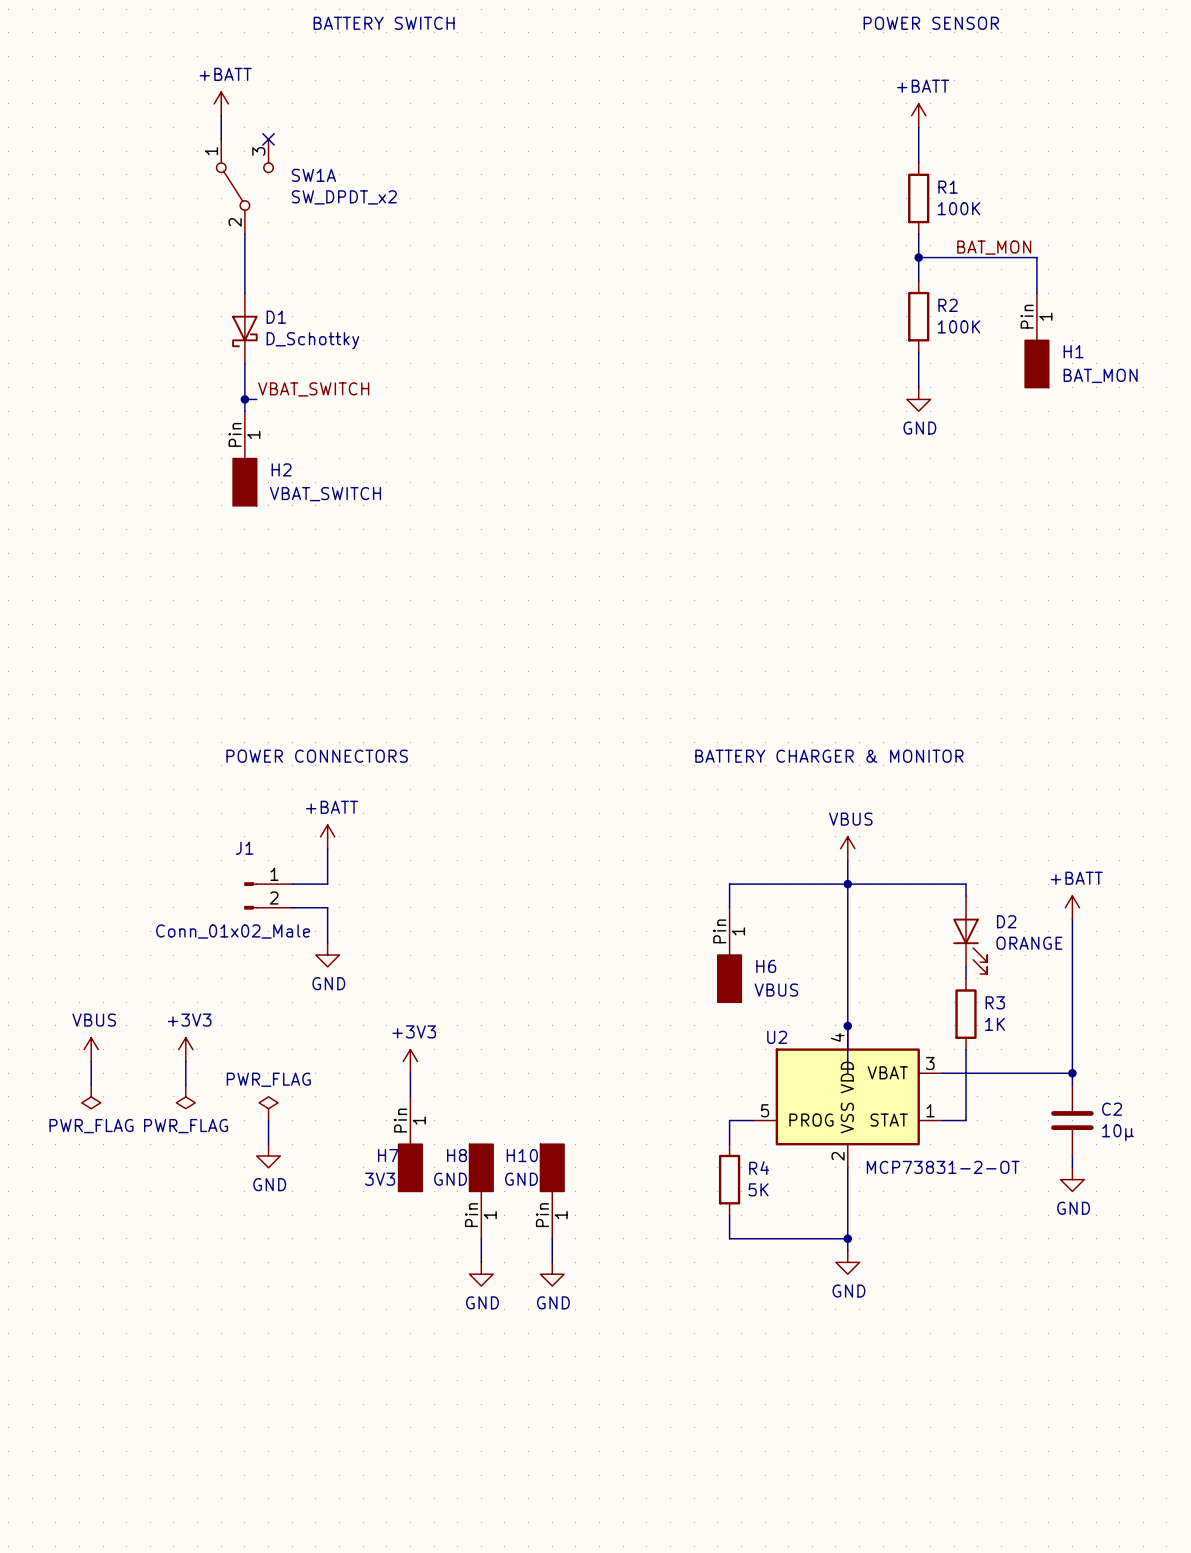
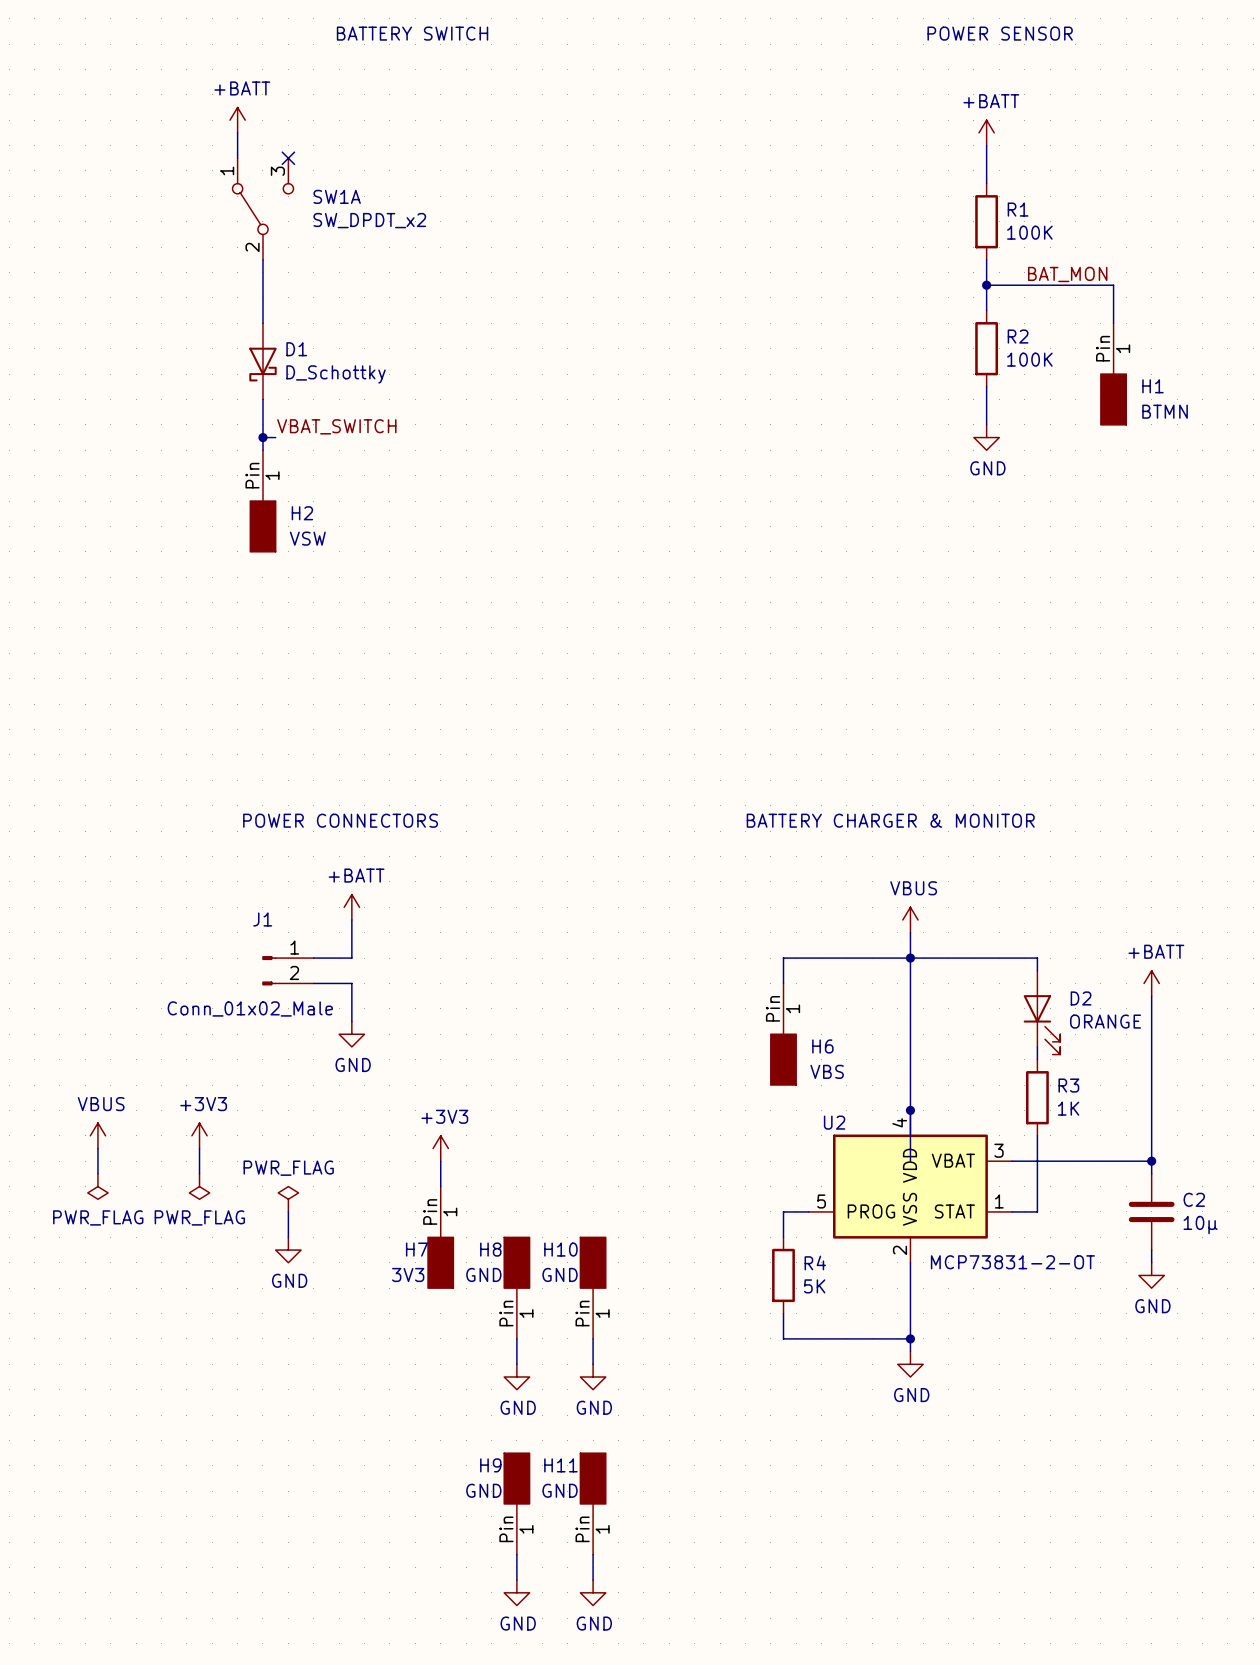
H1 value: BAT_MON (1100, 375) -> BTMN (1165, 411)
H2 value: VBAT_SWITCH (325, 494) -> VSW (307, 538)
H6 value: VBUS (776, 990) -> VBS (827, 1071)
H9: none -> GND (516, 1503)
H11: none -> GND (593, 1503)
wire: none -> (516, 1554) (516, 1580)
wire: none -> (593, 1554) (593, 1580)
power symbol: none -> GND (516, 1592)
power symbol: none -> GND (593, 1592)

